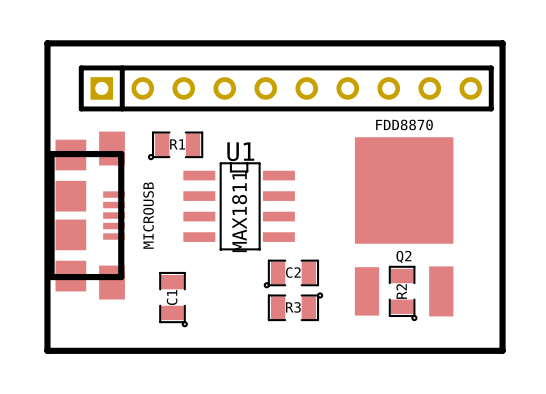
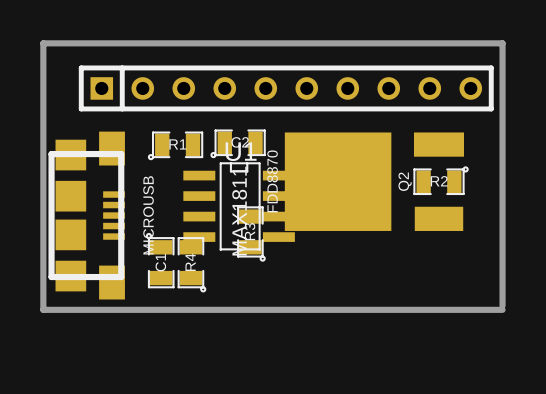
board edge: (47, 43) (47, 350) (502, 350) (502, 305) -> (47, 43) (43, 43) (43, 309) (502, 309)
Q2 rotation: 0° (404, 226) -> 90° counterclockwise (374, 181)
R4: none -> (191, 264)
C2 position: (291, 273) -> (238, 143)
R2 rotation: 0° (403, 293) -> 90° counterclockwise (441, 180)
R2 position: (403, 293) -> (441, 180)
C1 rotation: 0° (173, 299) -> 180° (160, 260)
C1 position: (173, 299) -> (160, 260)
R3 rotation: 0° (295, 306) -> 90° clockwise (251, 233)
R3 position: (295, 306) -> (251, 233)

